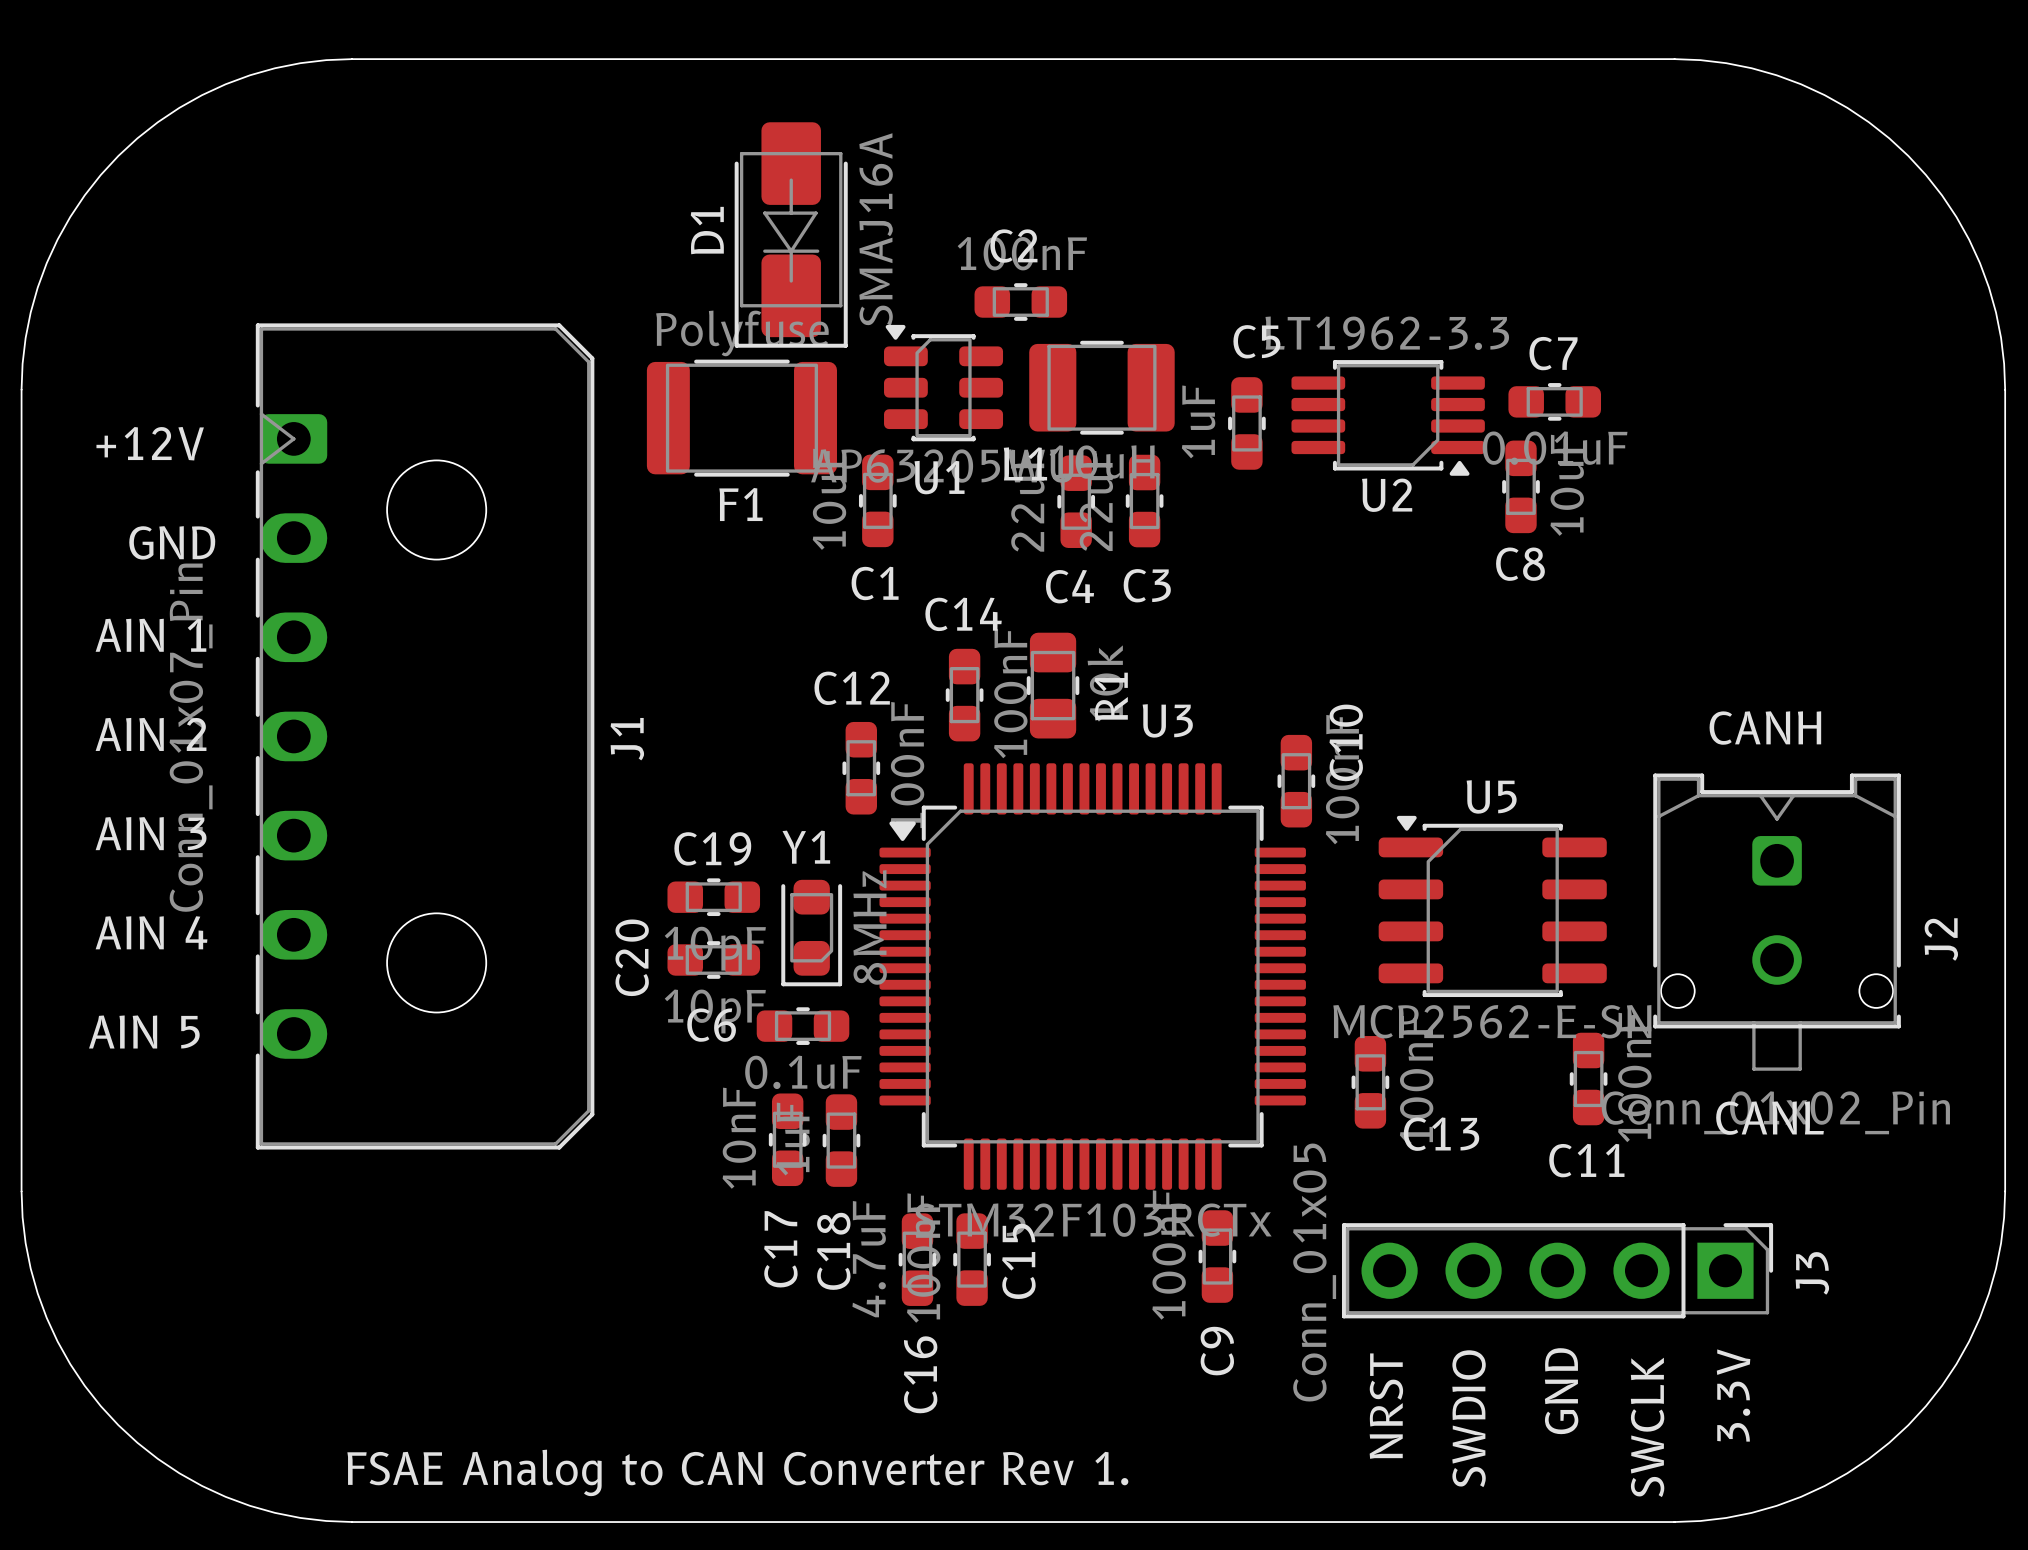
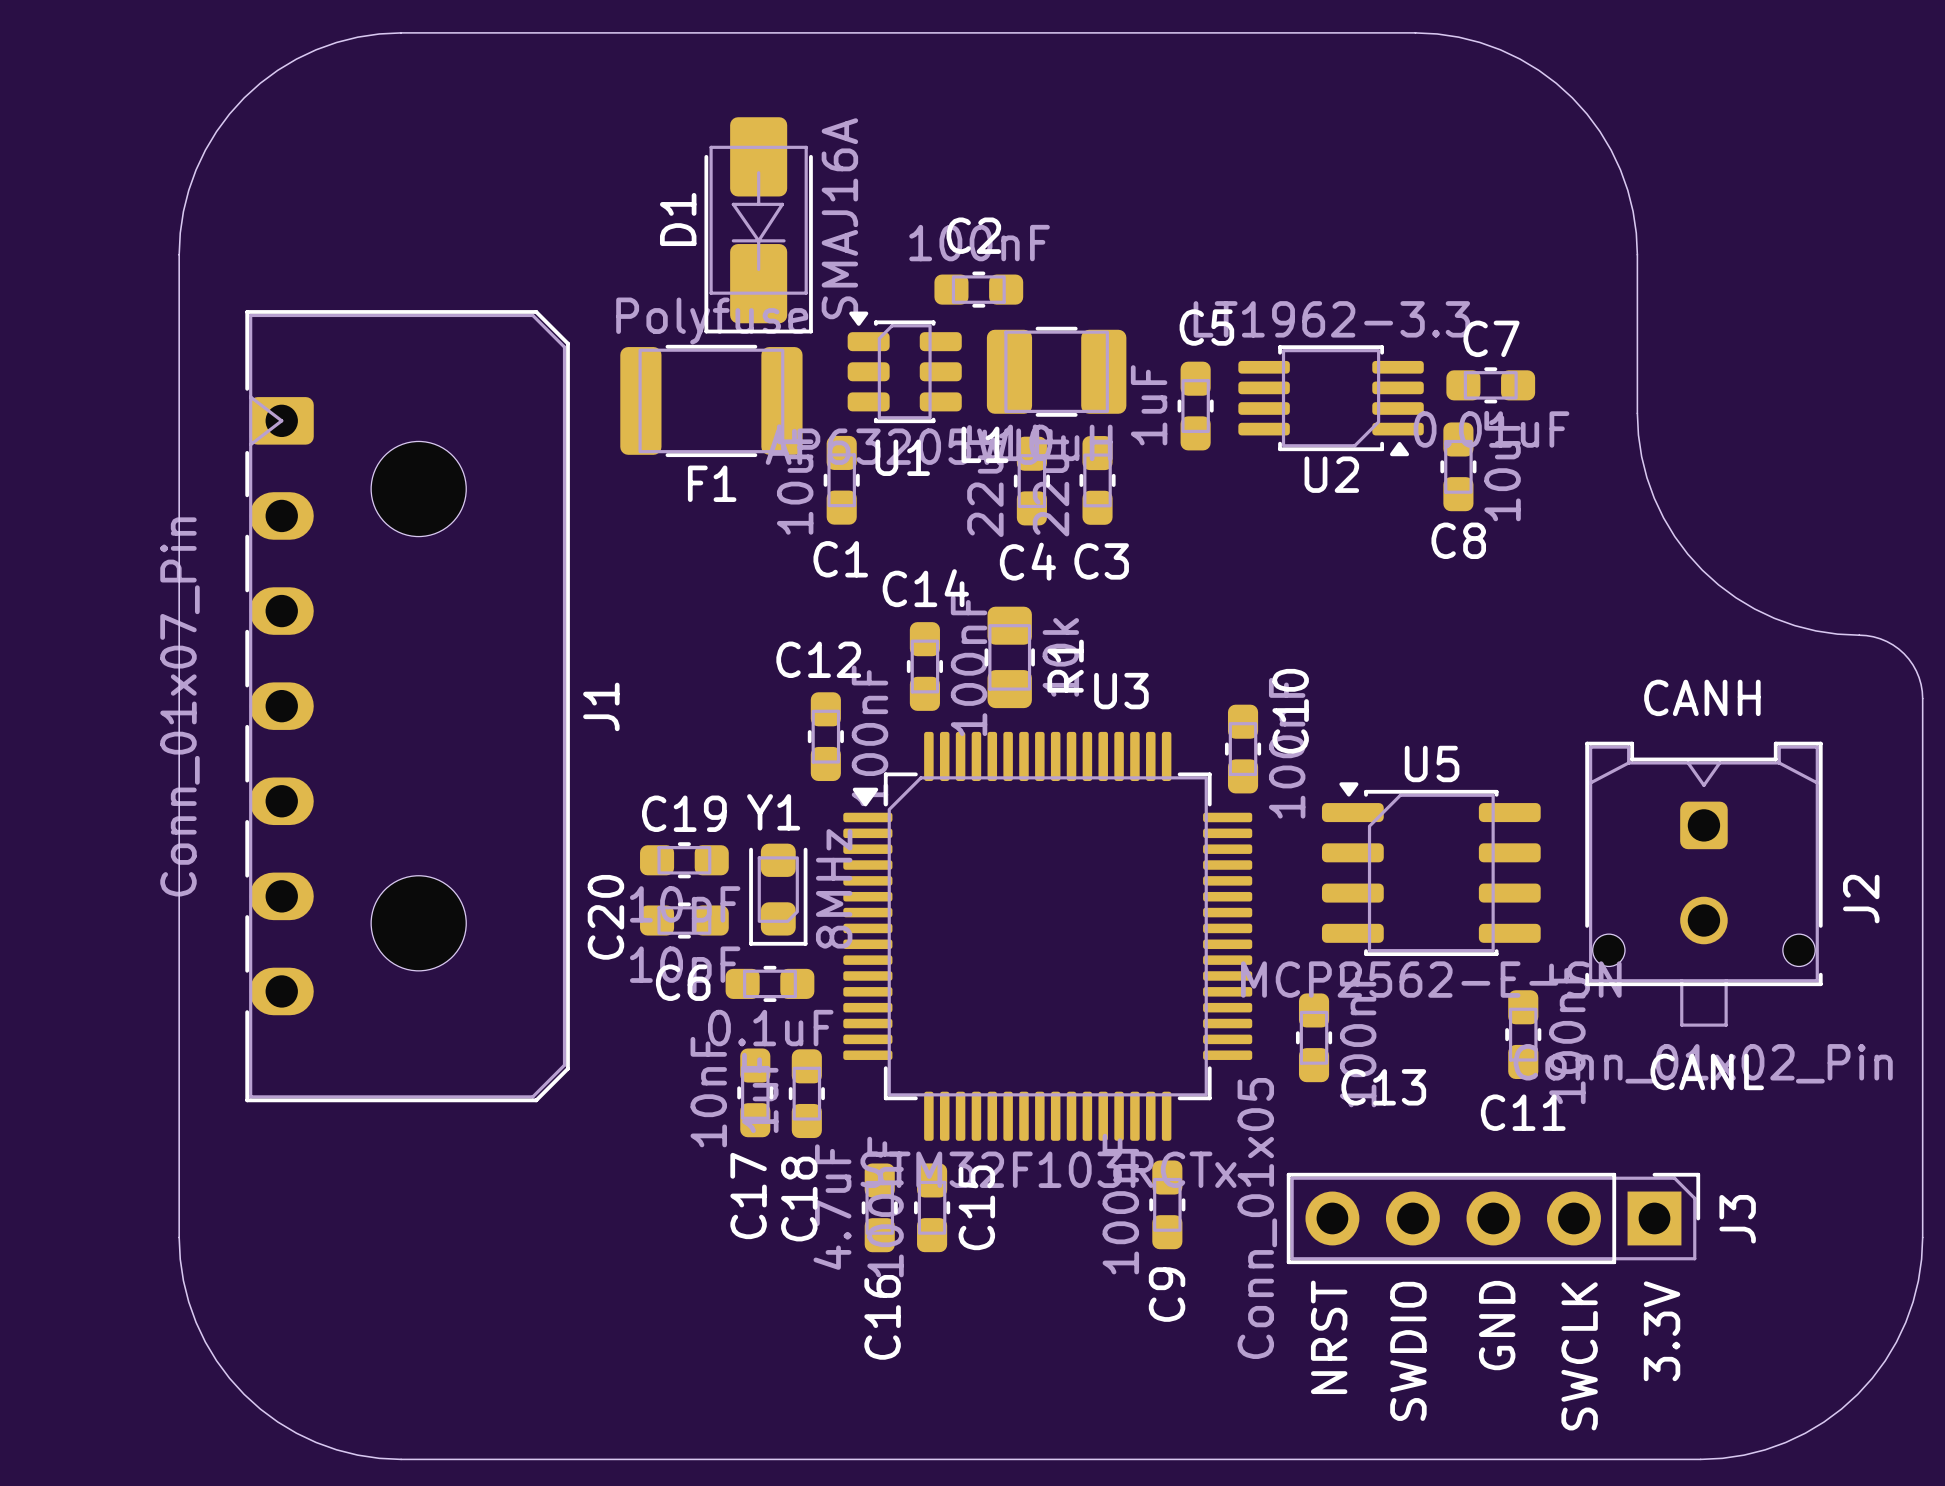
text: +12V (150, 443) -> none
text: GND (172, 542) -> none
text: AIN 1 (150, 635) -> none
board edge: (2005, 728) (2005, 389) (2001, 337) (1988, 287) (1980, 263) (1956, 216) (1942, 195) (1908, 155) (1889, 138) (1847, 107) (1801, 84) (1776, 75) (1726, 63) (1674, 59) (352, 59) (300, 63) (274, 68) (250, 75) (202, 95) (179, 107) (137, 138) (100, 175) (84, 195) (57, 239) (46, 263) (30, 312) (25, 337) (21, 389) (21, 1191) (25, 1243) (37, 1293) (57, 1341) (70, 1364) (100, 1406) (137, 1442) (157, 1458) (202, 1485) (225, 1496) (274, 1512) (326, 1520) (418, 1522) -> (1922, 698) (1919, 677) (1912, 664) (1904, 653) (1893, 644) (1873, 636) (1837, 634) (1794, 625) (1754, 609) (1718, 584) (1687, 554) (1674, 536) (1663, 517) (1646, 477) (1638, 435) (1636, 233) (1633, 211) (1620, 169) (1599, 131) (1572, 97) (1538, 70) (1500, 49) (1458, 37) (1415, 32) (401, 32) (357, 37) (336, 42) (296, 59) (260, 83) (244, 97) (216, 131) (205, 150) (188, 190) (180, 233) (180, 1259) (188, 1301) (205, 1342) (229, 1378) (260, 1409) (296, 1433) (316, 1442) (357, 1455) (401, 1459)
text: AIN 2 (151, 734) -> none
text: AIN 3 (151, 833) -> none
text: AIN 4 (151, 932) -> none
text: AIN 5 (144, 1031) -> none
board edge: (2005, 1191) (2004, 1217) (1996, 1268) (1980, 1317) (1956, 1364) (1942, 1385) (1908, 1425) (1889, 1442) (1847, 1473) (1801, 1496) (1751, 1512) (1726, 1517) (1674, 1522) -> (1922, 1142) (1921, 1259) (1913, 1301) (1905, 1322) (1885, 1360) (1857, 1394) (1841, 1409) (1805, 1433) (1765, 1449) (1722, 1458) (1605, 1459)
text: FSAE Analog to CAN Converter Rev 1. (737, 1472) -> none

